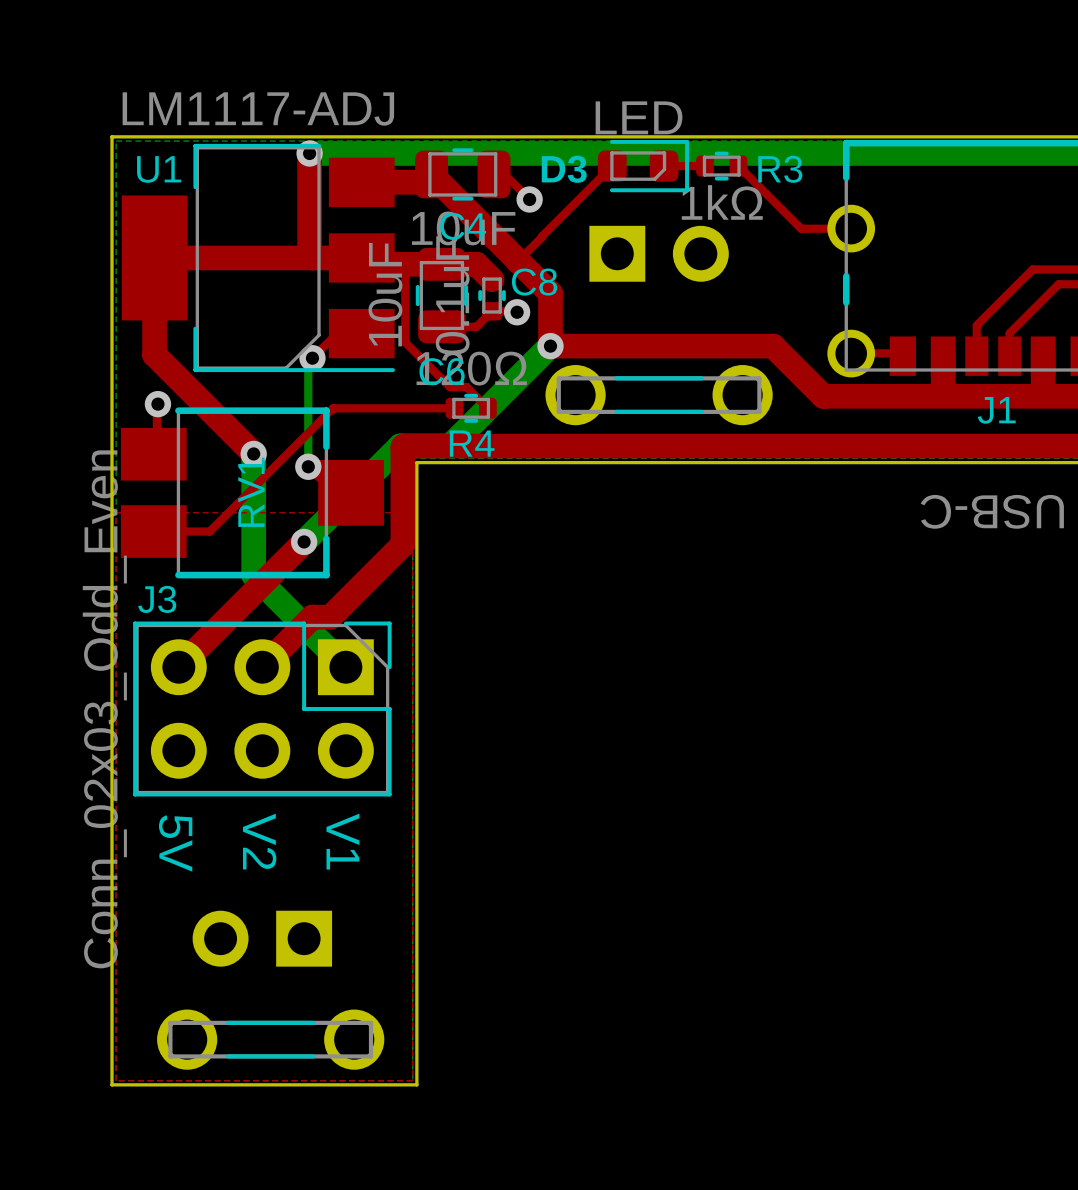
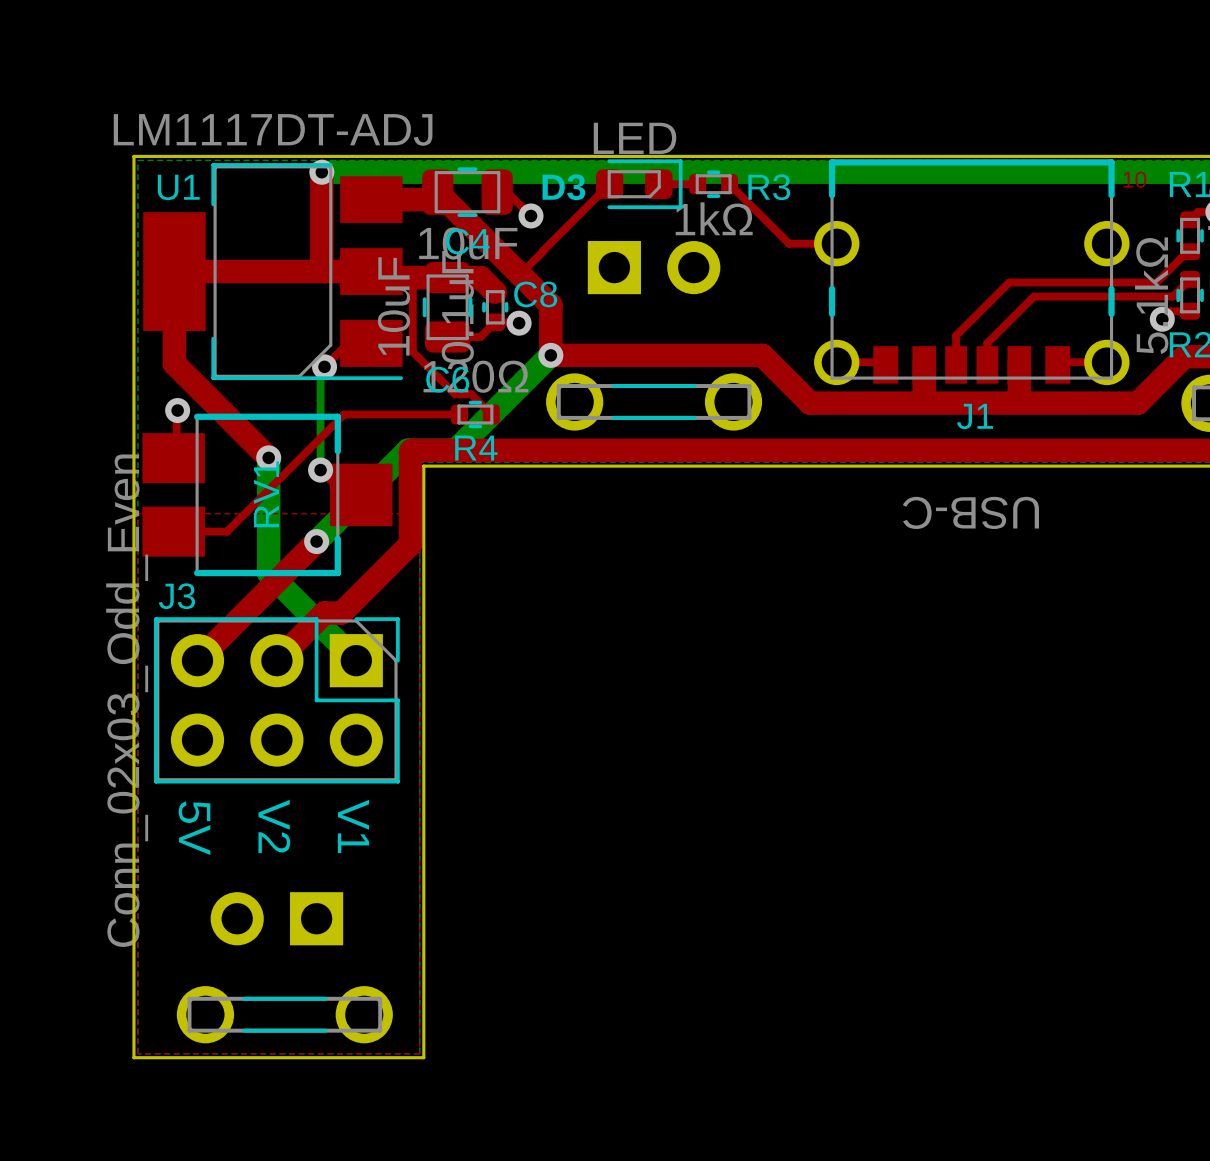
U1 value: LM1117-ADJ (258, 108) -> LM1117DT-ADJ (273, 129)

